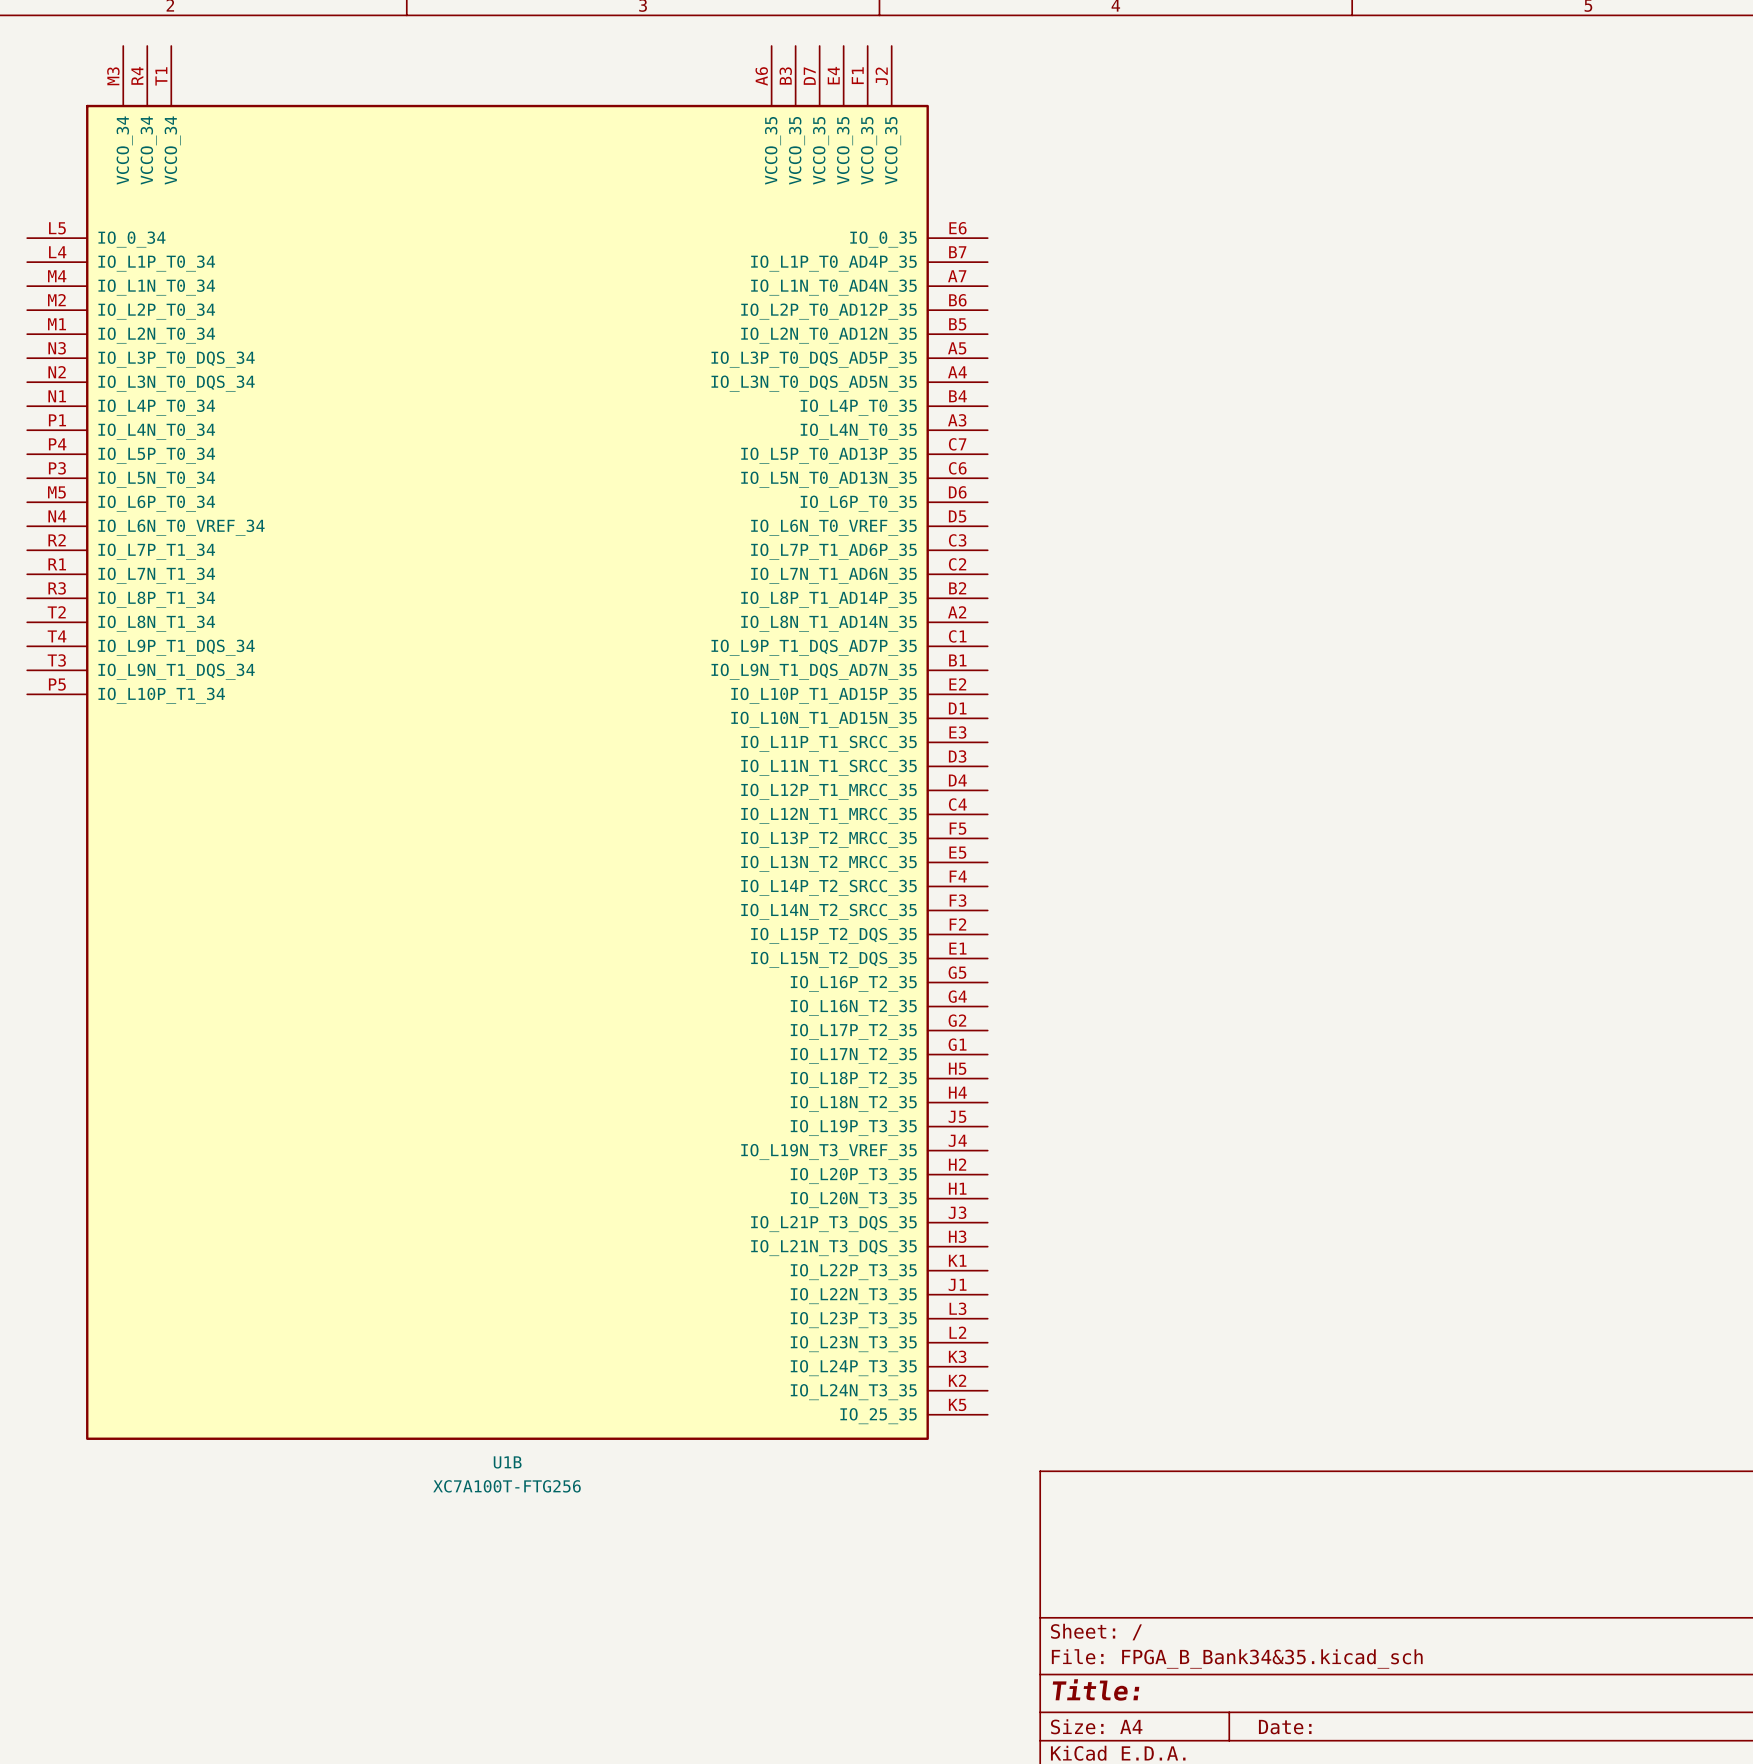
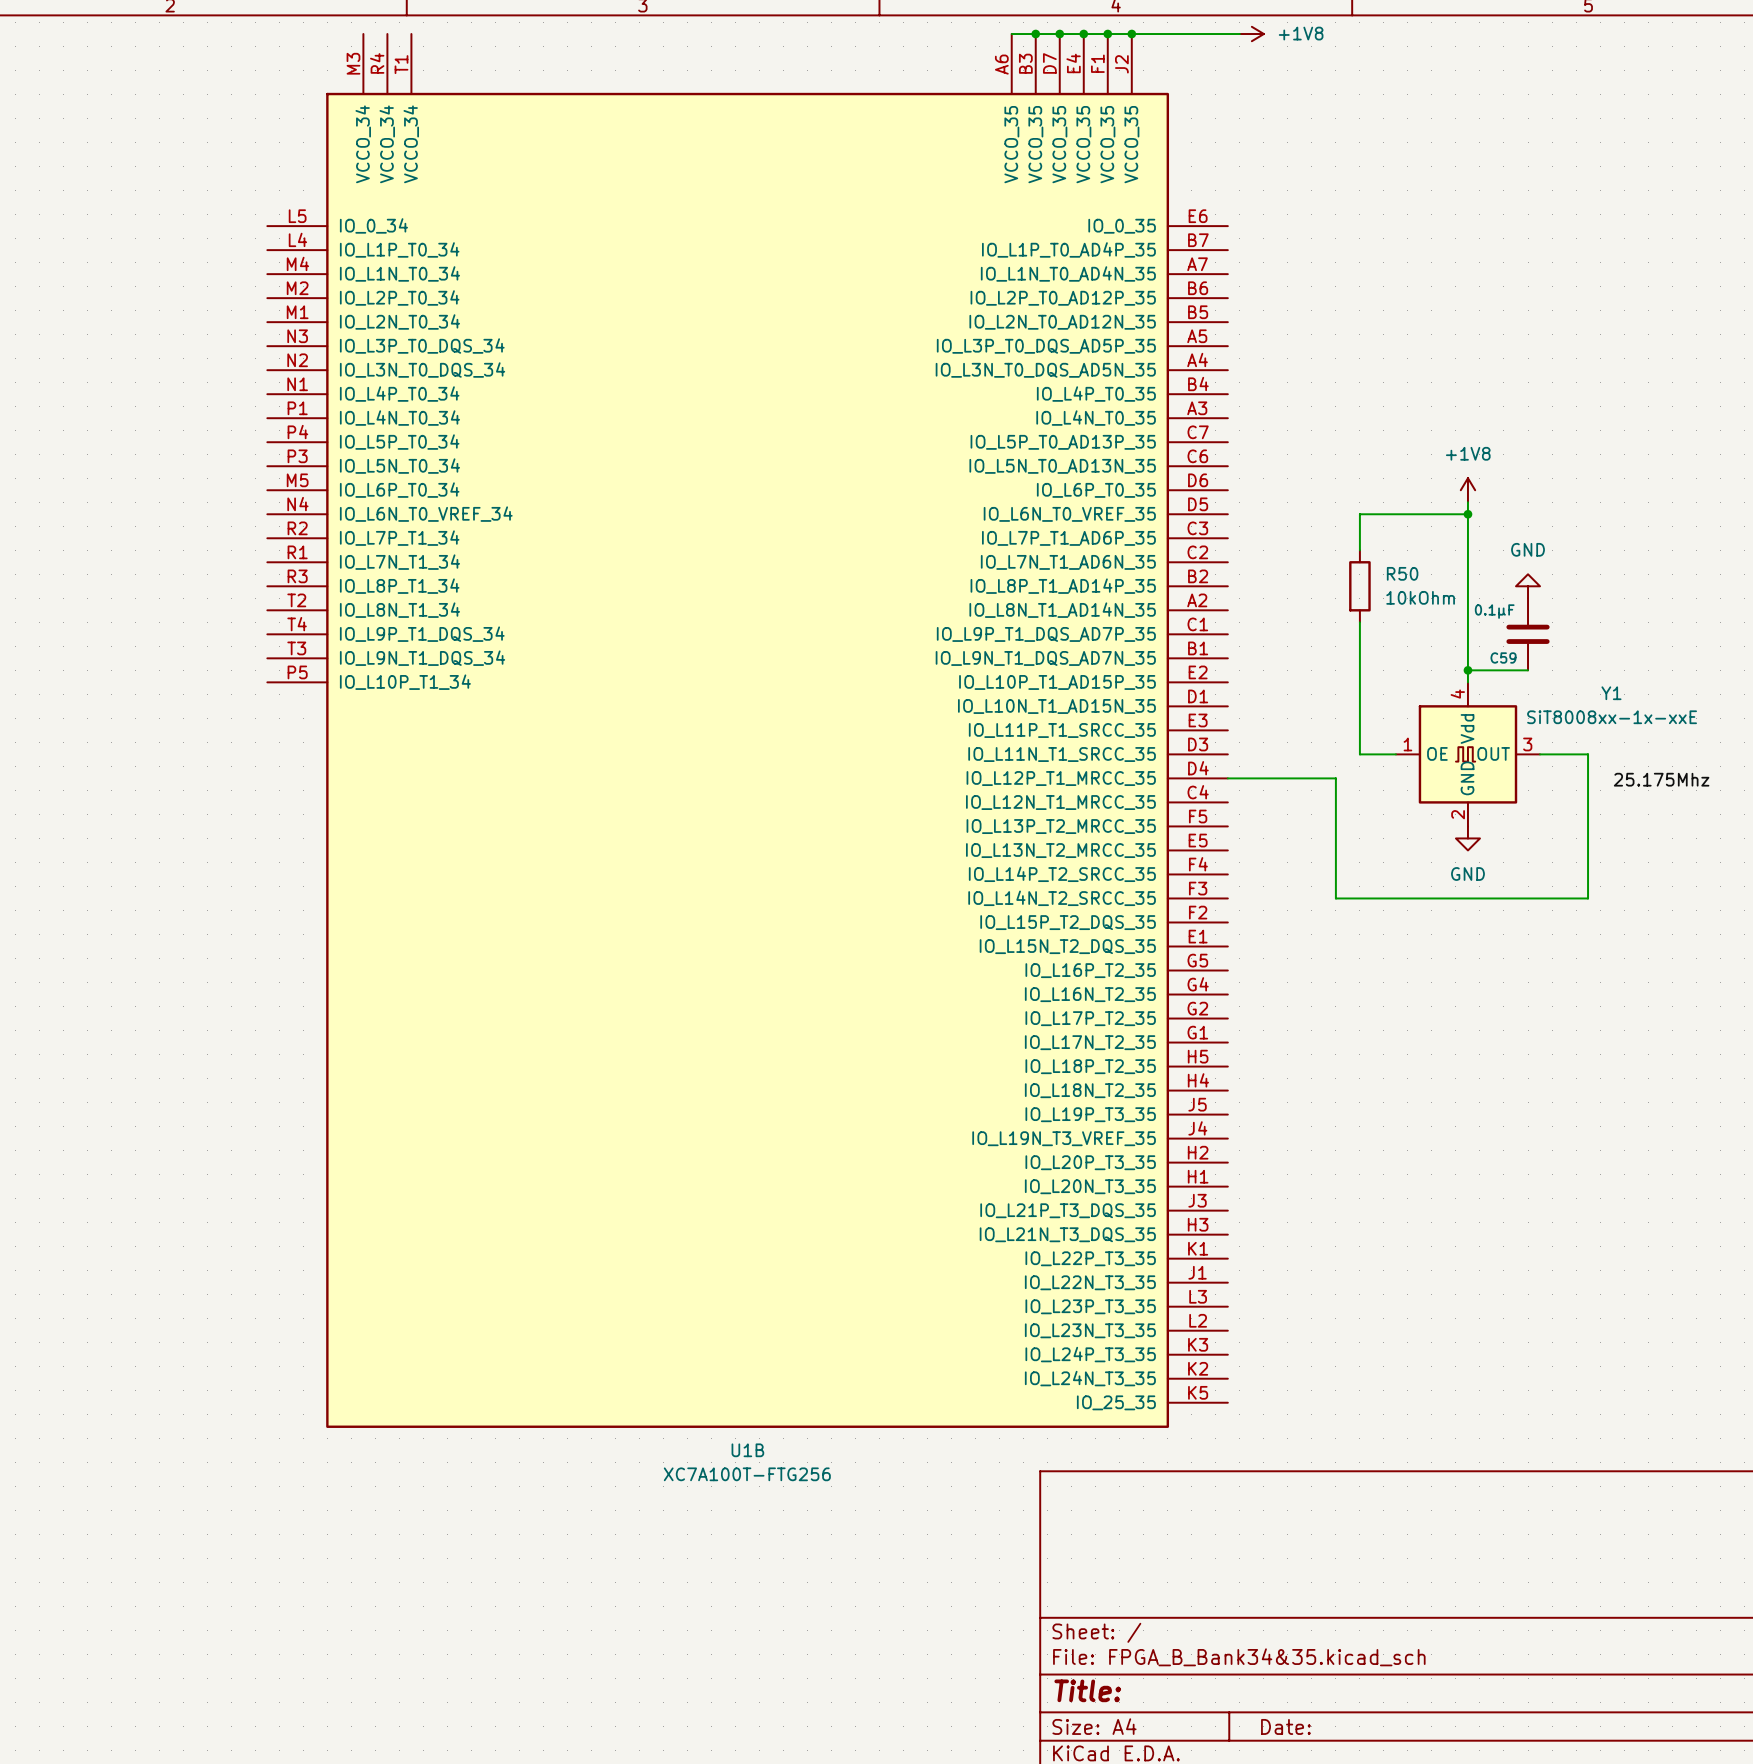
wire: none -> (1011, 34) (1239, 34)
junction: none -> (1035, 34)
junction: none -> (1059, 34)
junction: none -> (1083, 34)
junction: none -> (1107, 34)
junction: none -> (1131, 34)
power symbol: none -> +1V8 (1251, 34)
power symbol: none -> +1V8 (1467, 490)
wire: none -> (1467, 502) (1467, 682)
wire: none -> (1467, 514) (1359, 514) (1359, 550)
junction: none -> (1467, 514)
R50: none -> 10kOhm (1359, 586)
power symbol: none -> GND (1528, 586)
wire: none -> (1359, 622) (1359, 754) (1395, 754)
C59: none -> 0.1µF (1528, 634)
wire: none -> (1467, 670) (1528, 670)
junction: none -> (1467, 670)
U1B position: (507, 742) -> (747, 730)
Y1: none -> SiT8008xx-1x-xxE (1467, 754)
wire: none -> (1540, 754) (1588, 754) (1588, 898) (1335, 898) (1335, 778) (1227, 778)
label: none -> 25.175Mhz (1661, 779)
power symbol: none -> GND (1467, 838)

